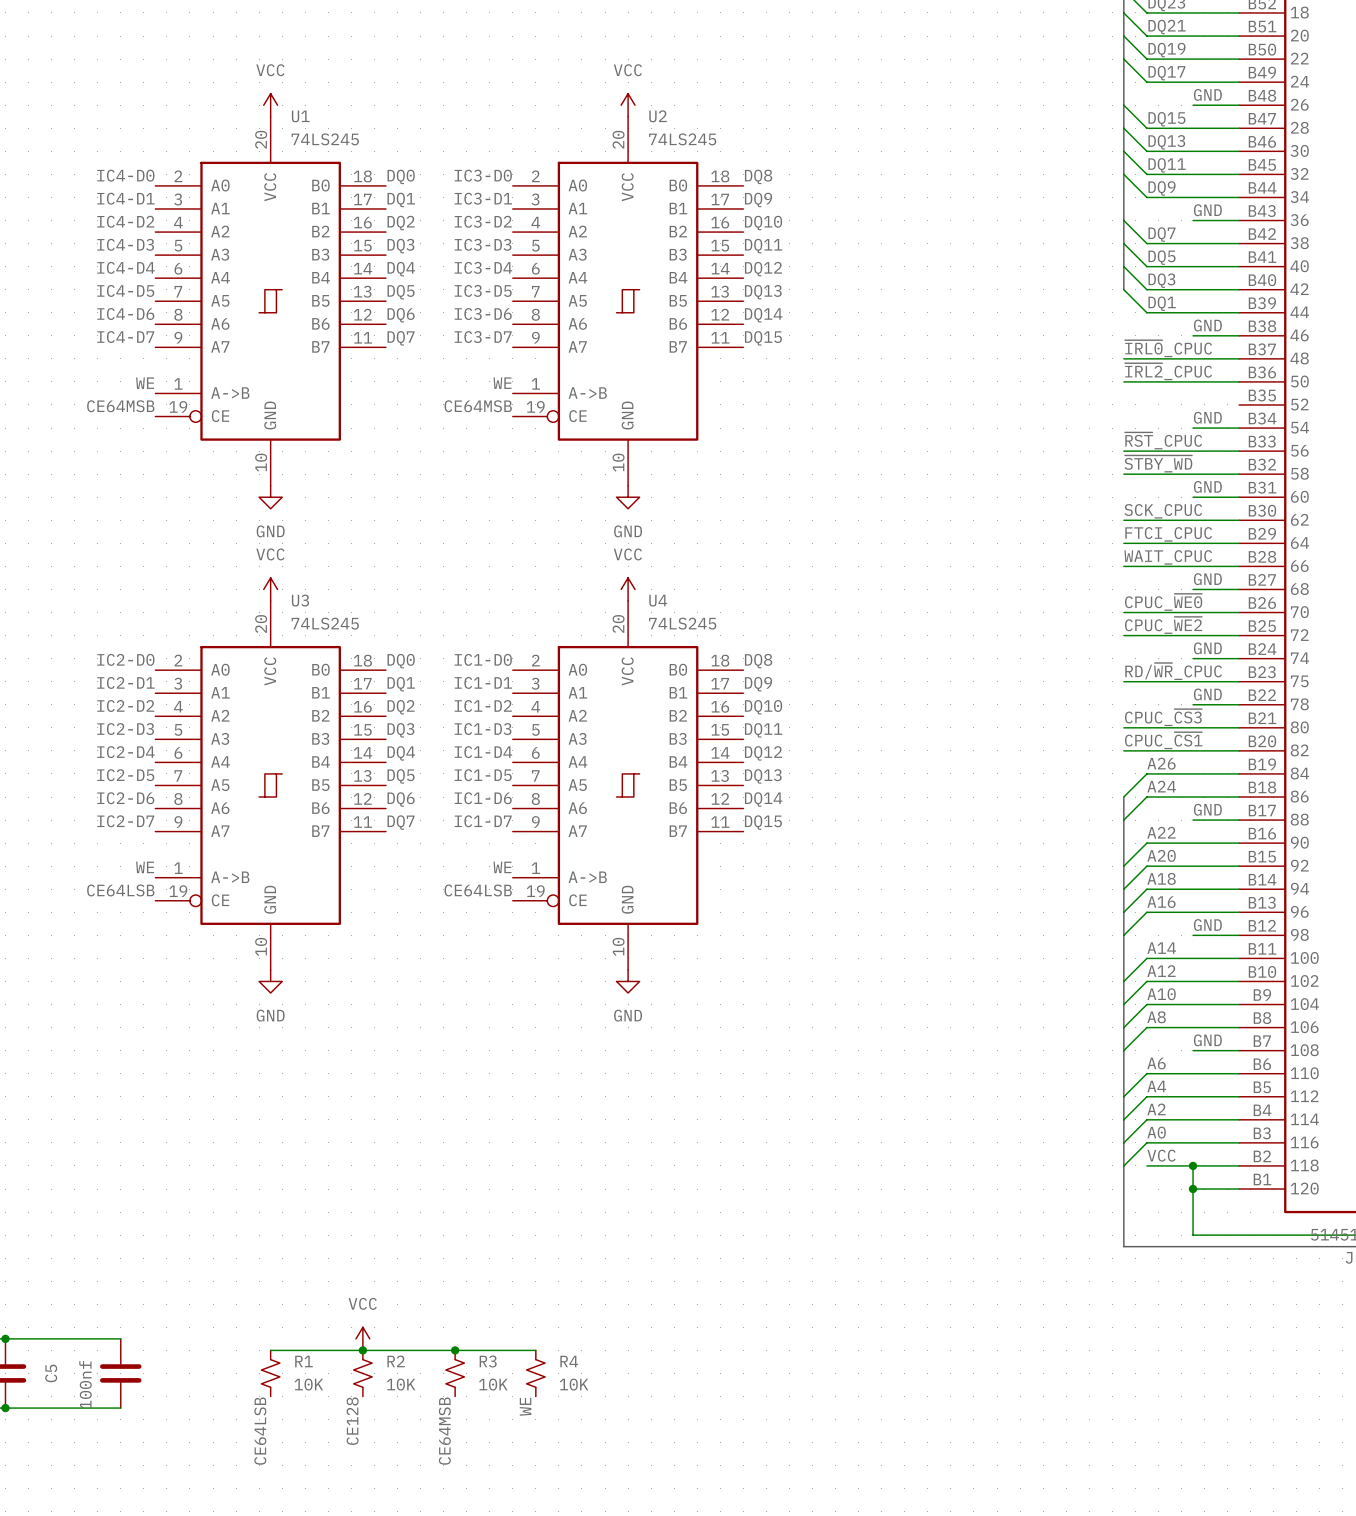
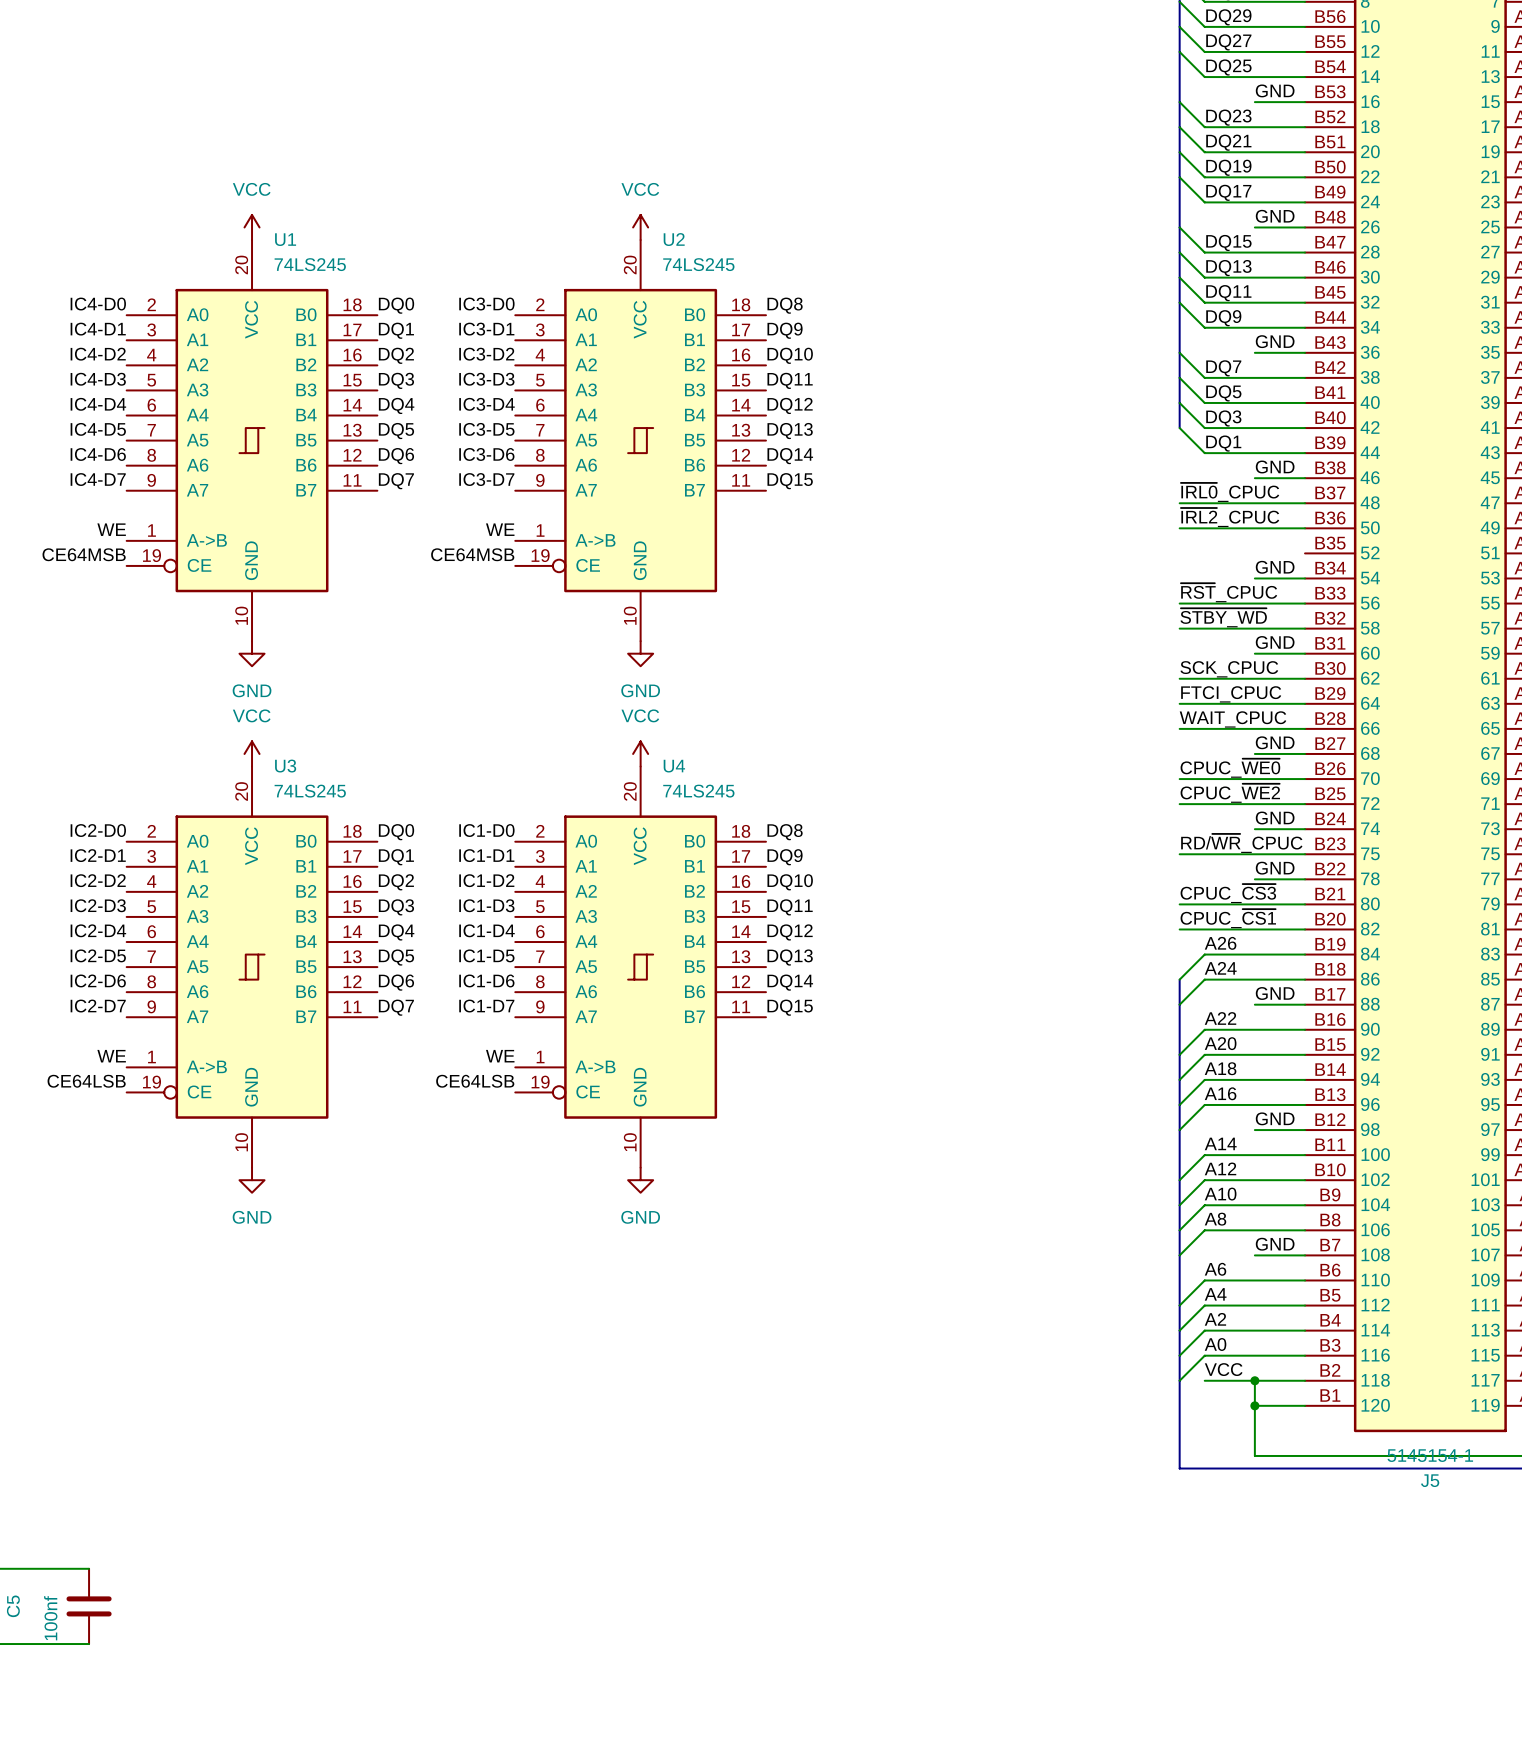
power symbol: VCC (362, 1338) -> none
wire: (270, 1350) (535, 1350) -> none
junction: (362, 1350) -> none
junction: (455, 1350) -> none
R1: 10K (270, 1373) -> none
R2: 10K (362, 1373) -> none
R3: 10K (455, 1373) -> none
R4: 10K (535, 1373) -> none
label: WE (525, 1406) -> none
label: CE128 (352, 1421) -> none
label: CE64LSB (260, 1431) -> none
label: CE64MSB (444, 1431) -> none

